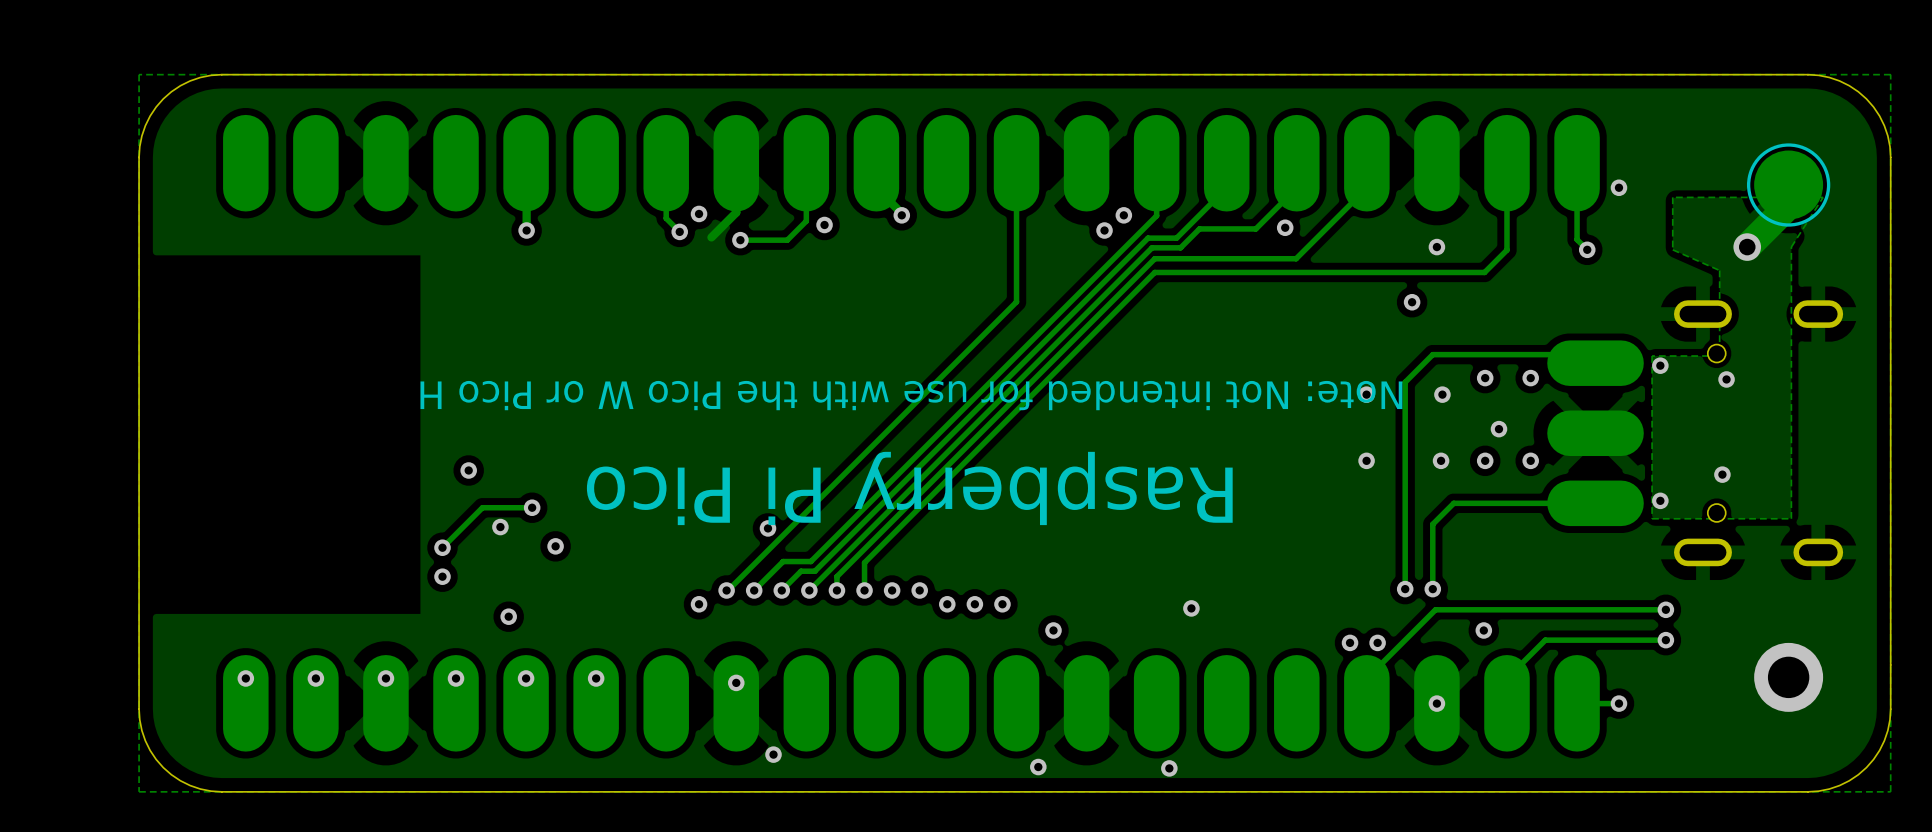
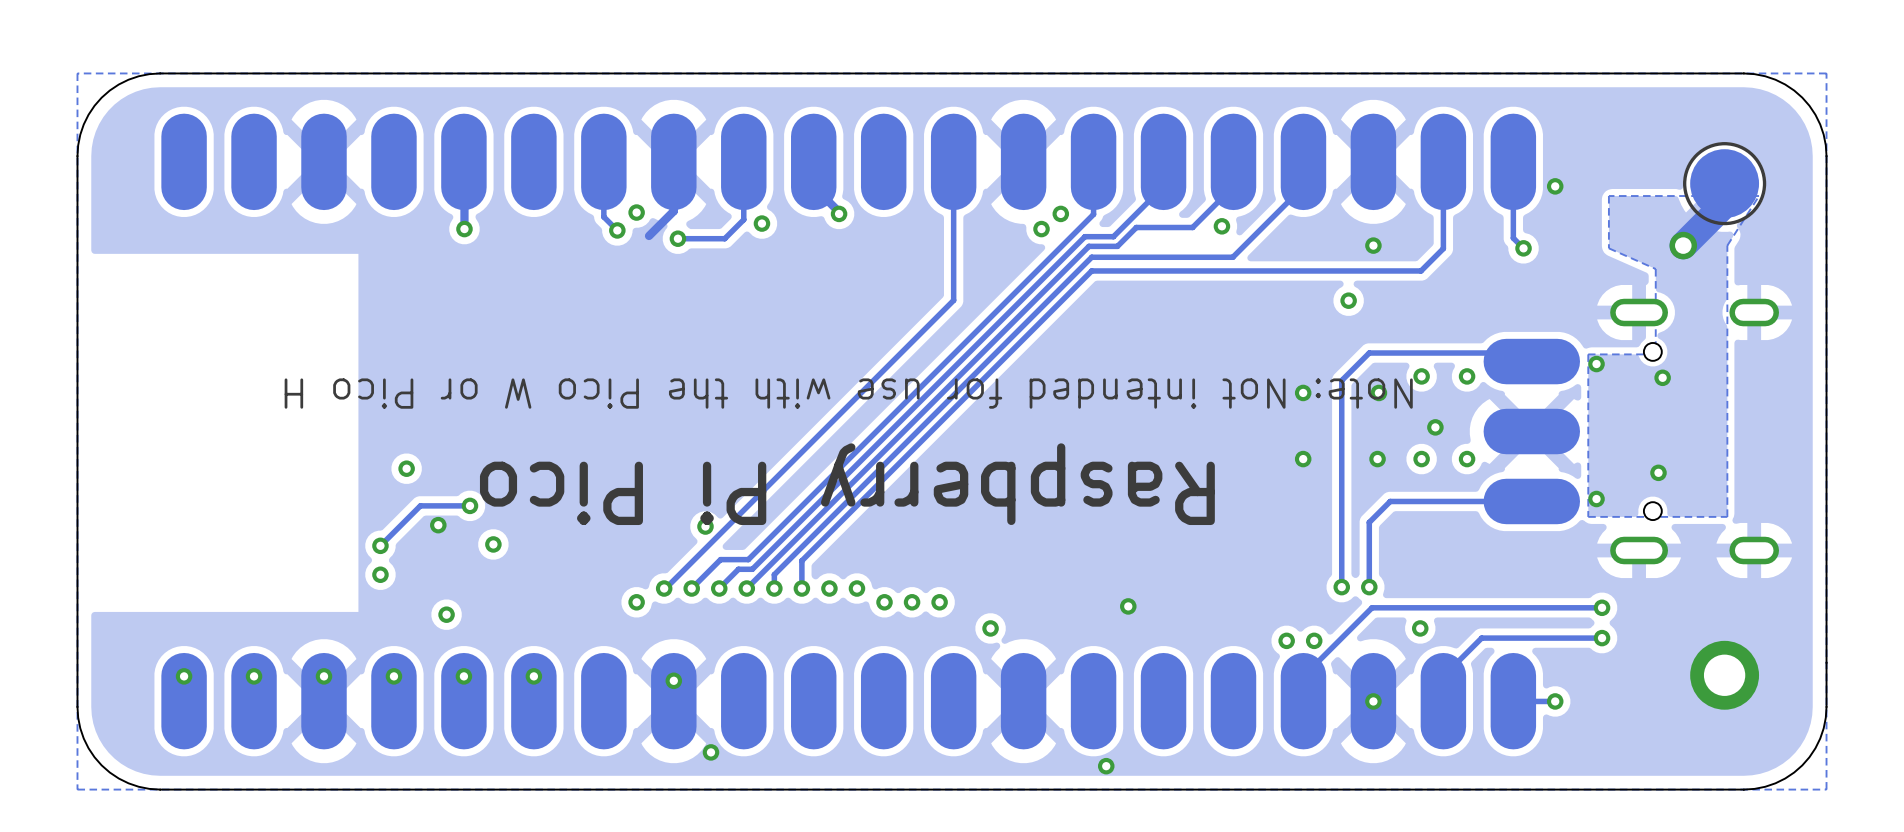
via: (1038, 767) -> none

